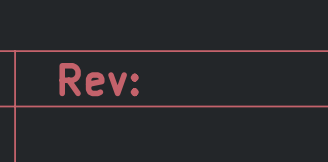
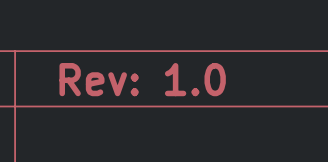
title block: Rev: (99, 79) -> Rev: 1.0 (142, 79)

